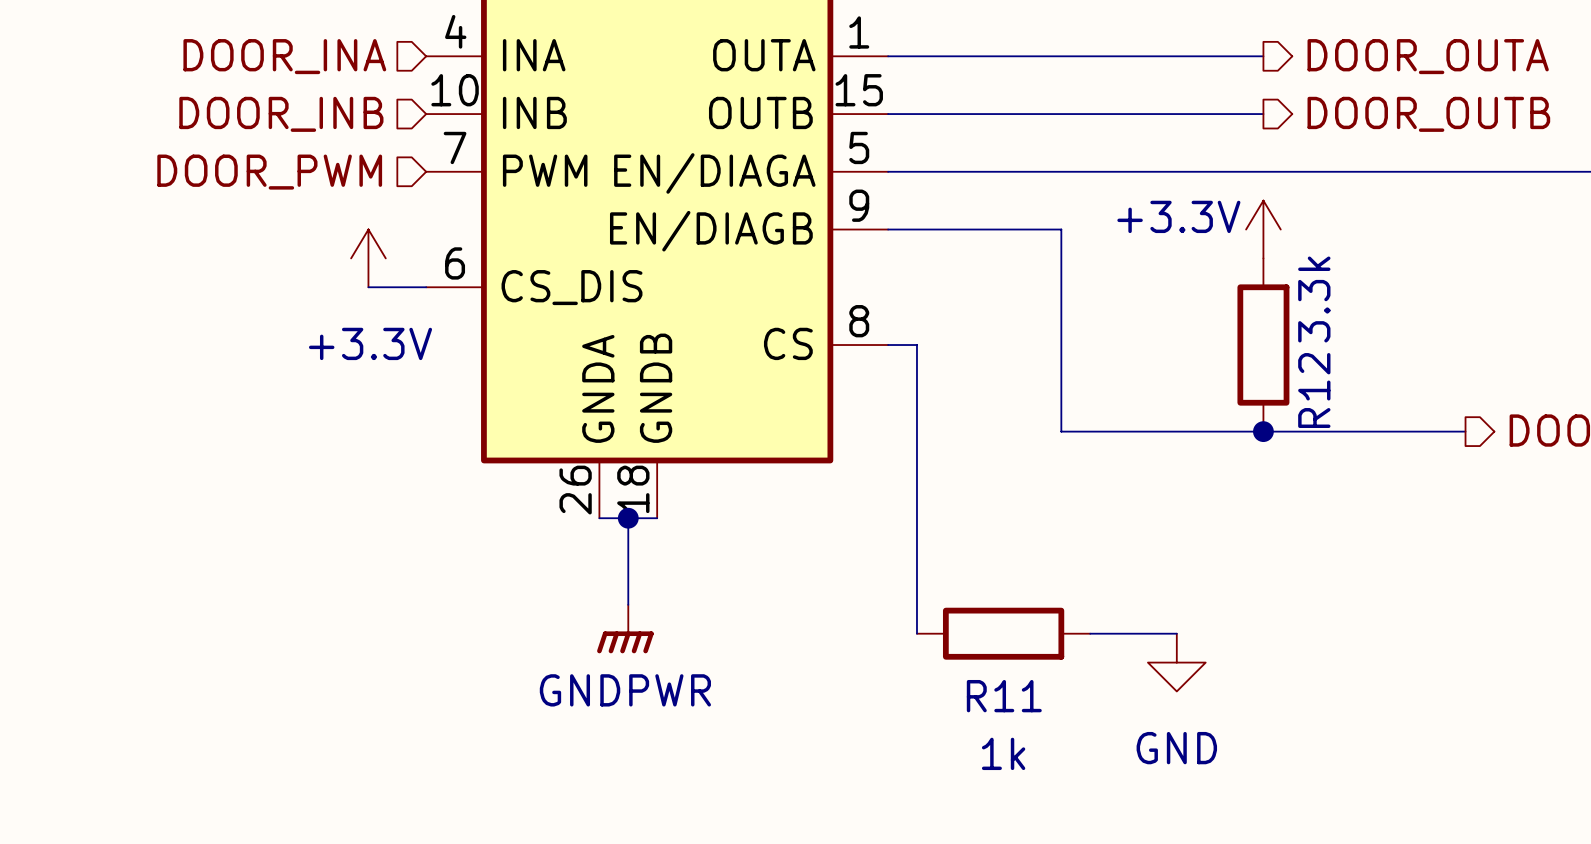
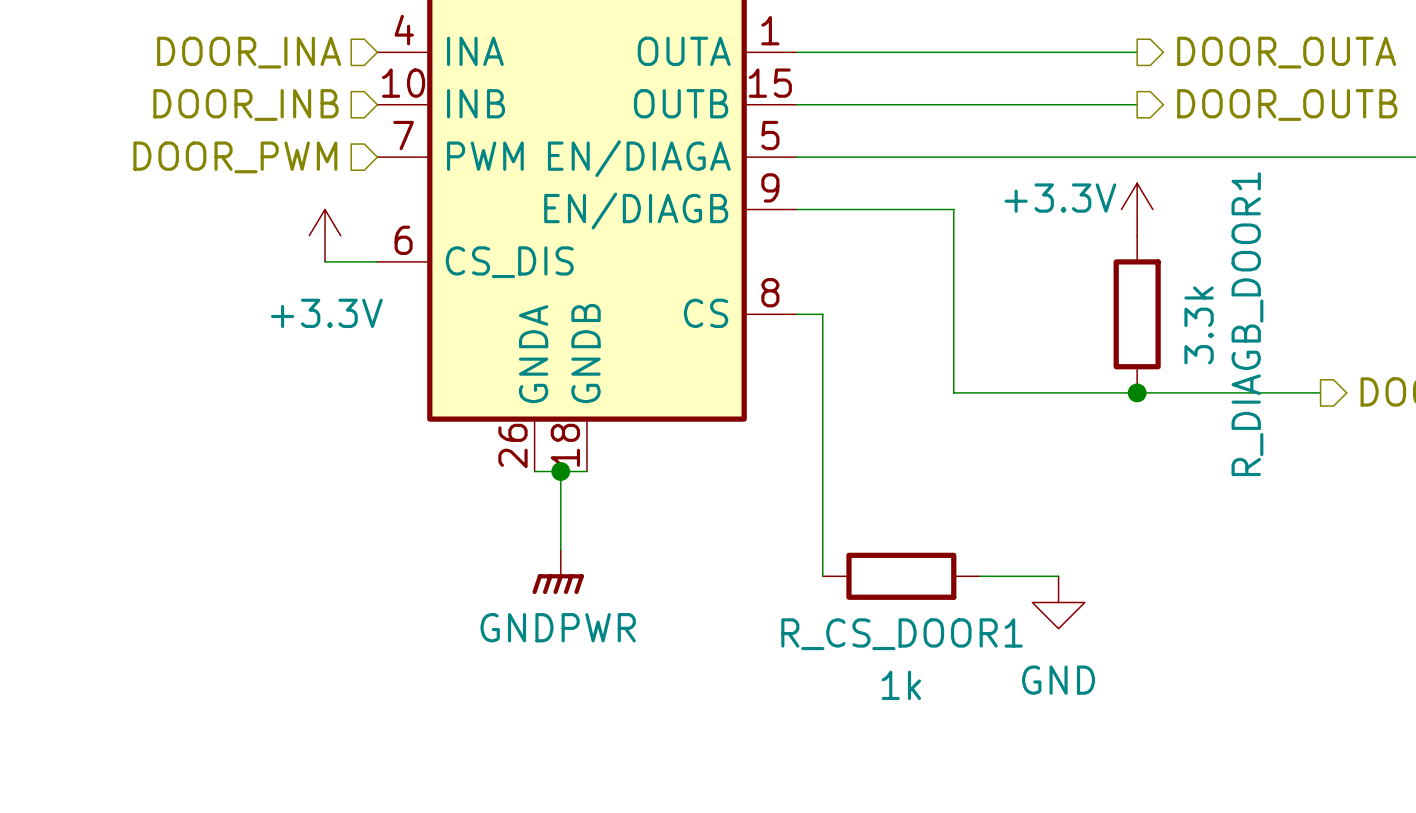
R12 value position: 3.3k (1314, 299) -> 3.3k (1199, 325)
R12 name: R12 (1314, 390) -> R_DIAGB_DOOR1 (1247, 324)
R11 name: R11 (1004, 696) -> R_CS_DOOR1 (901, 634)

